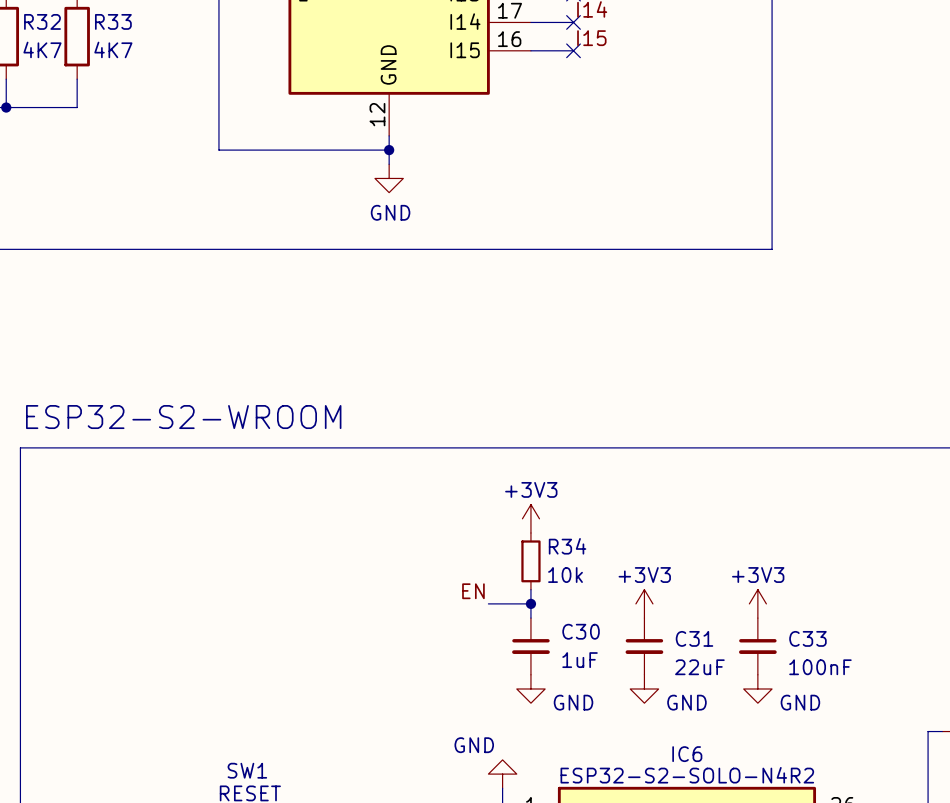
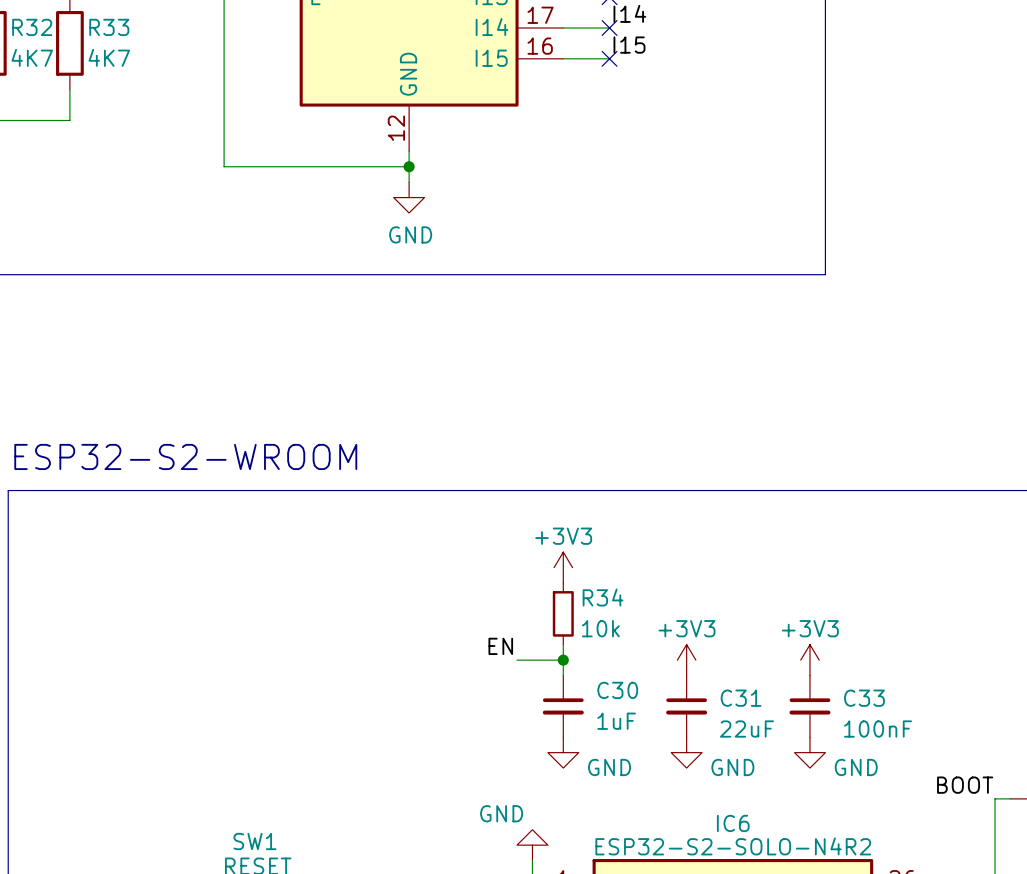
label: none -> BOOT (965, 785)

